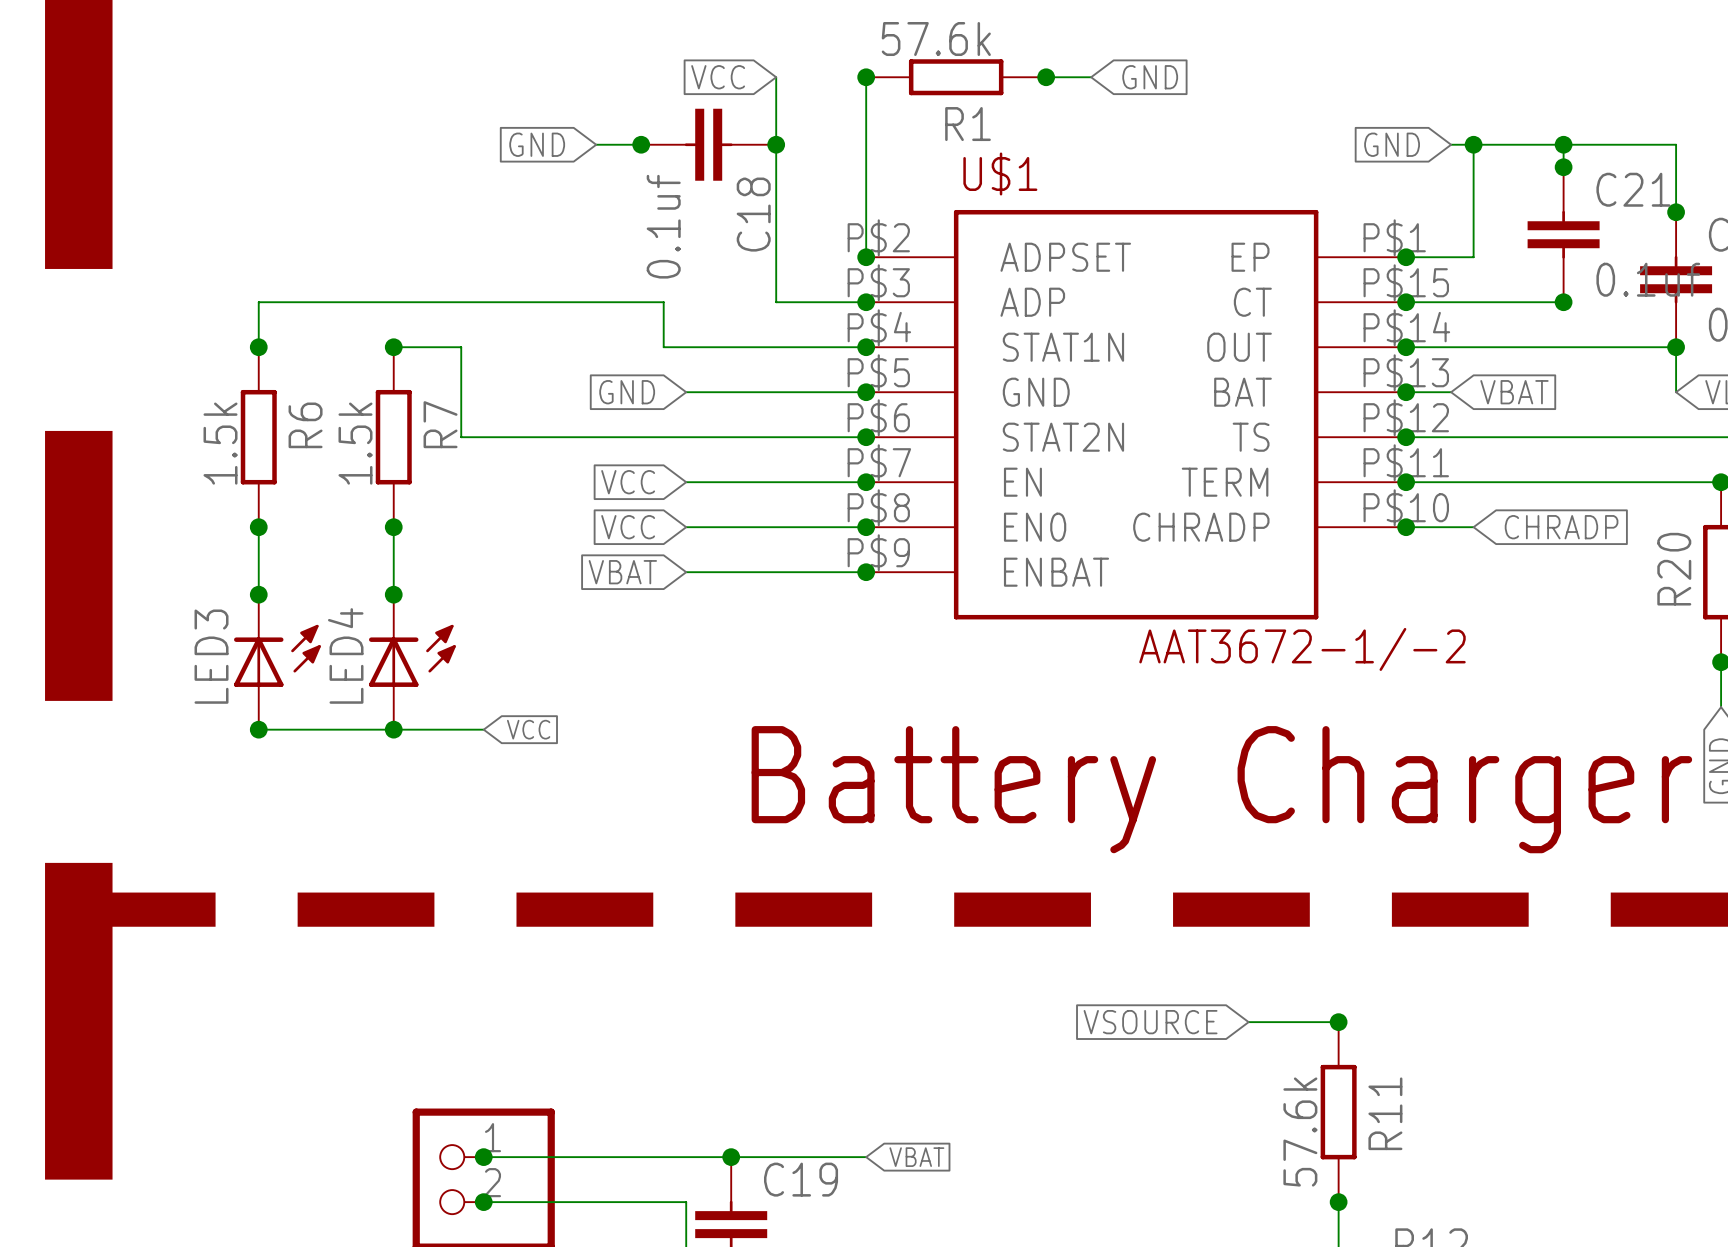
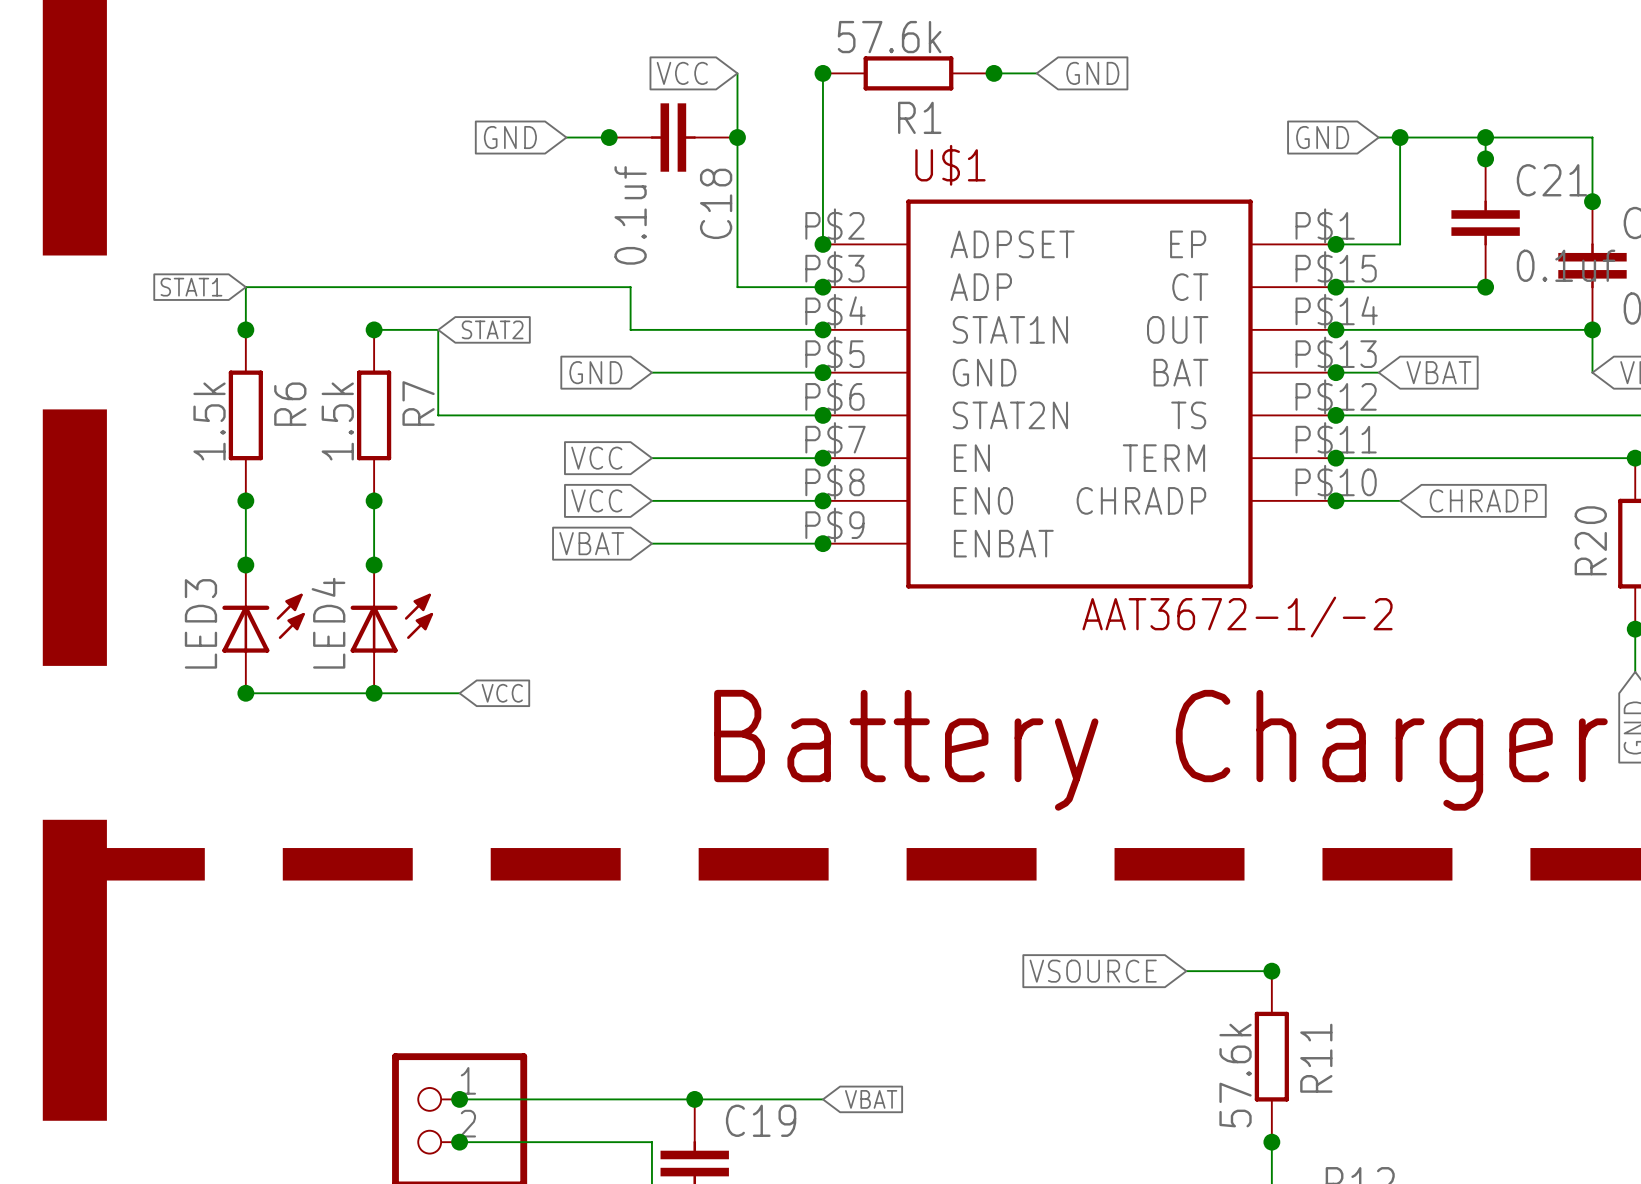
global label: none -> STAT1 (191, 287)
global label: none -> STAT2 (492, 329)

